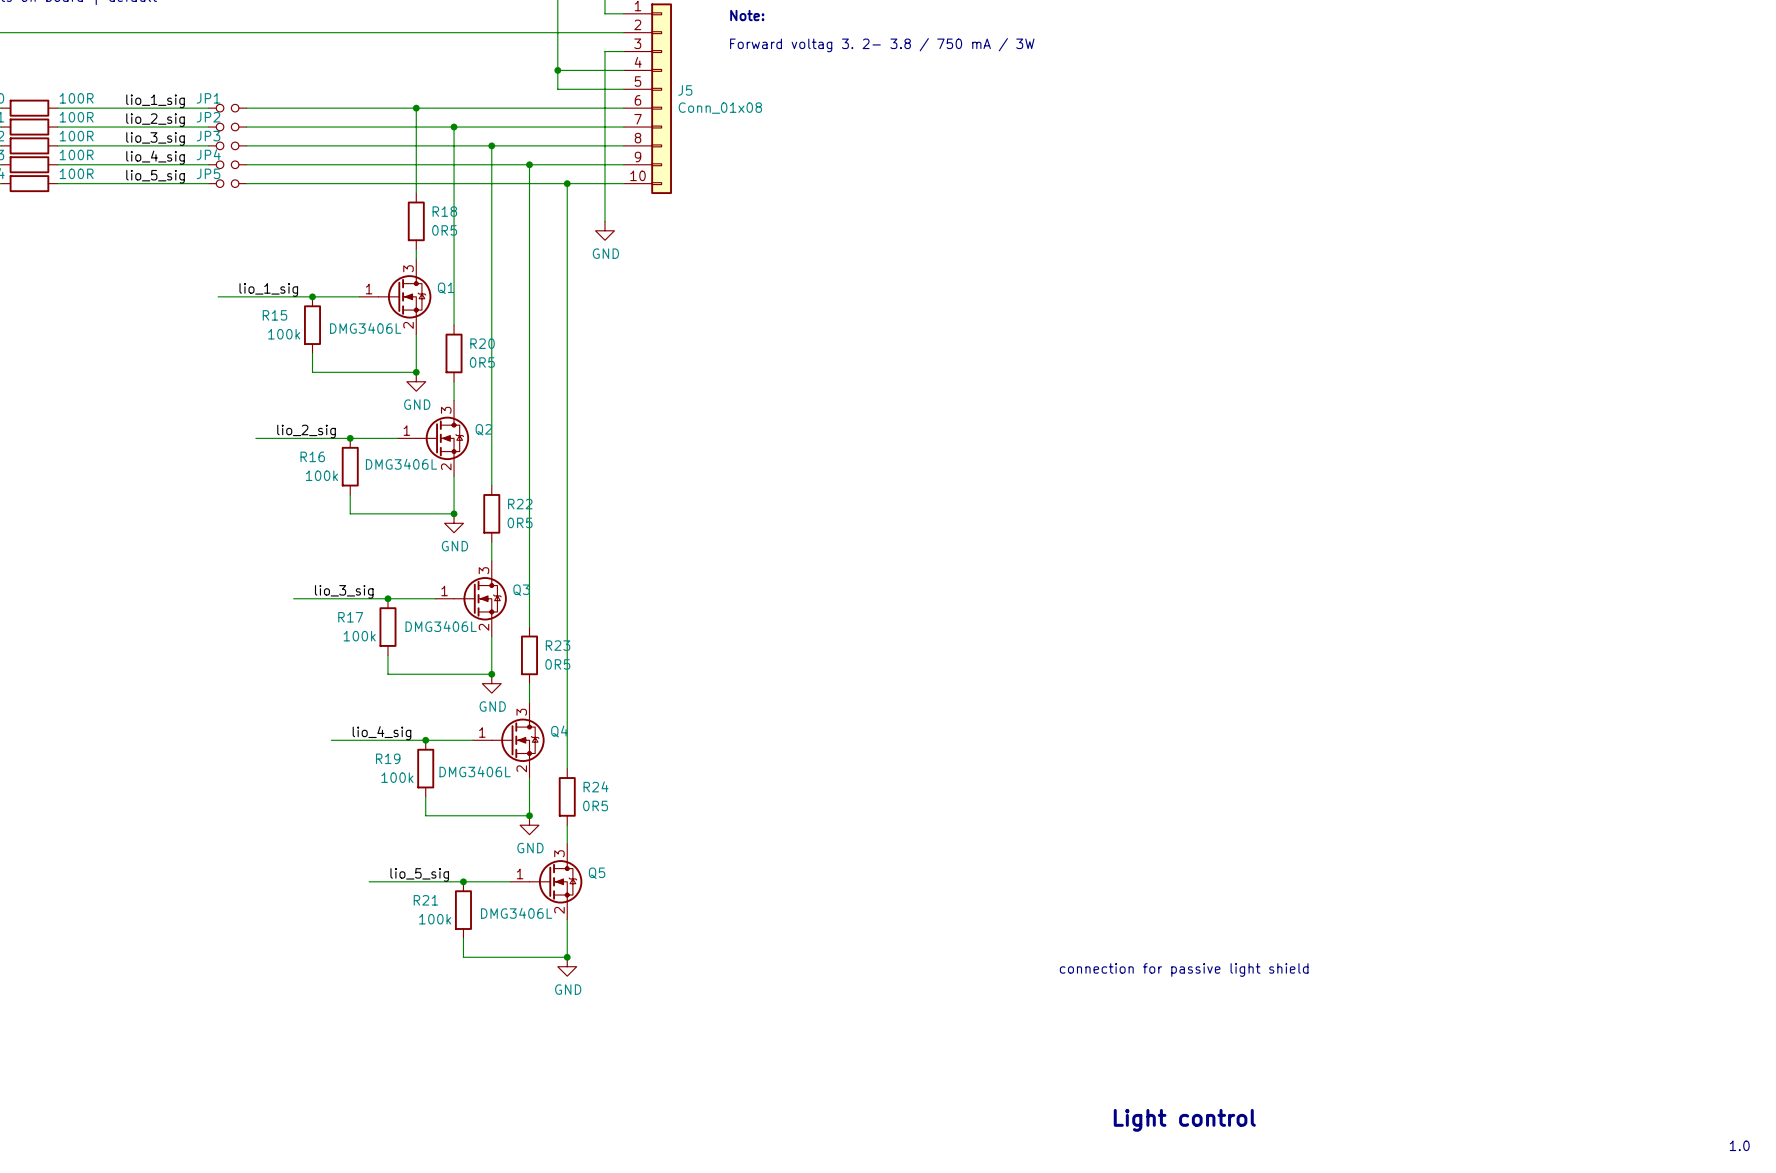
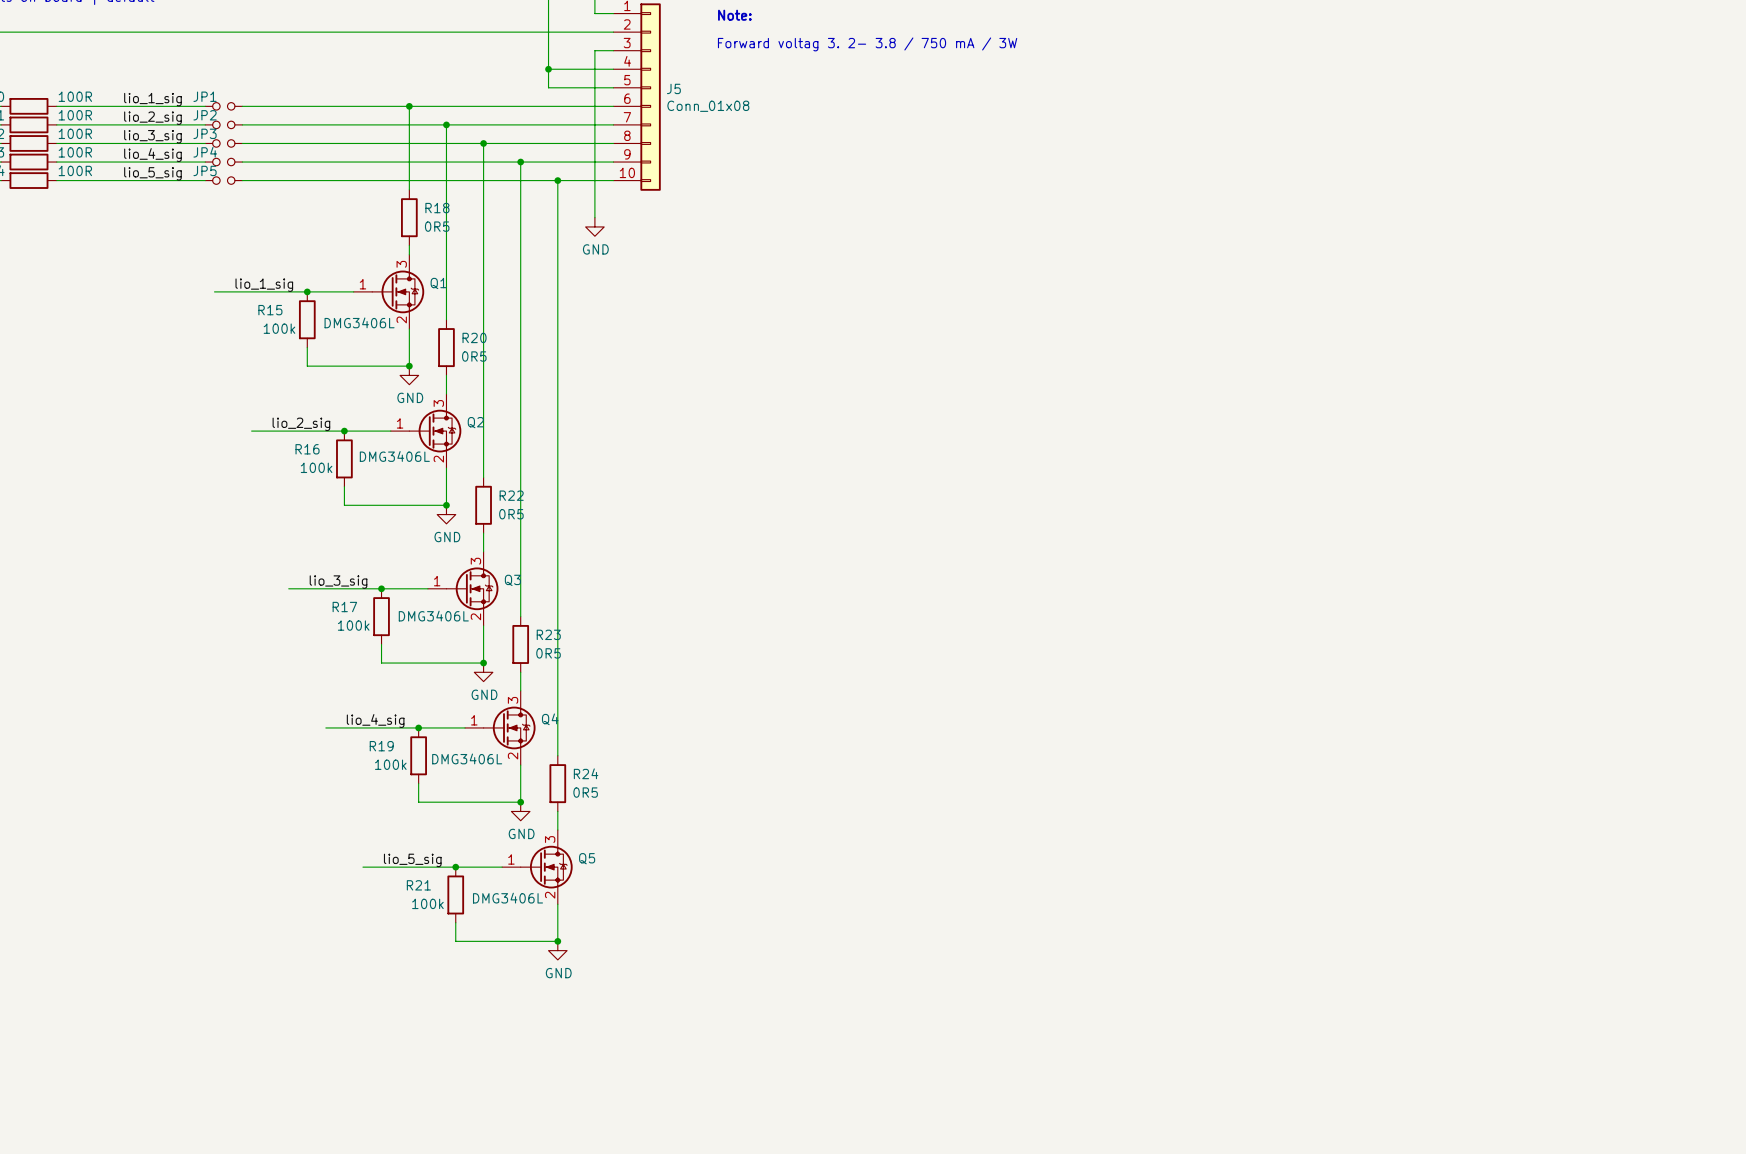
text: connection for passive light shield (1184, 970) -> none
text: Light control (1184, 1120) -> none
text: 1.0 (1739, 1145) -> none

